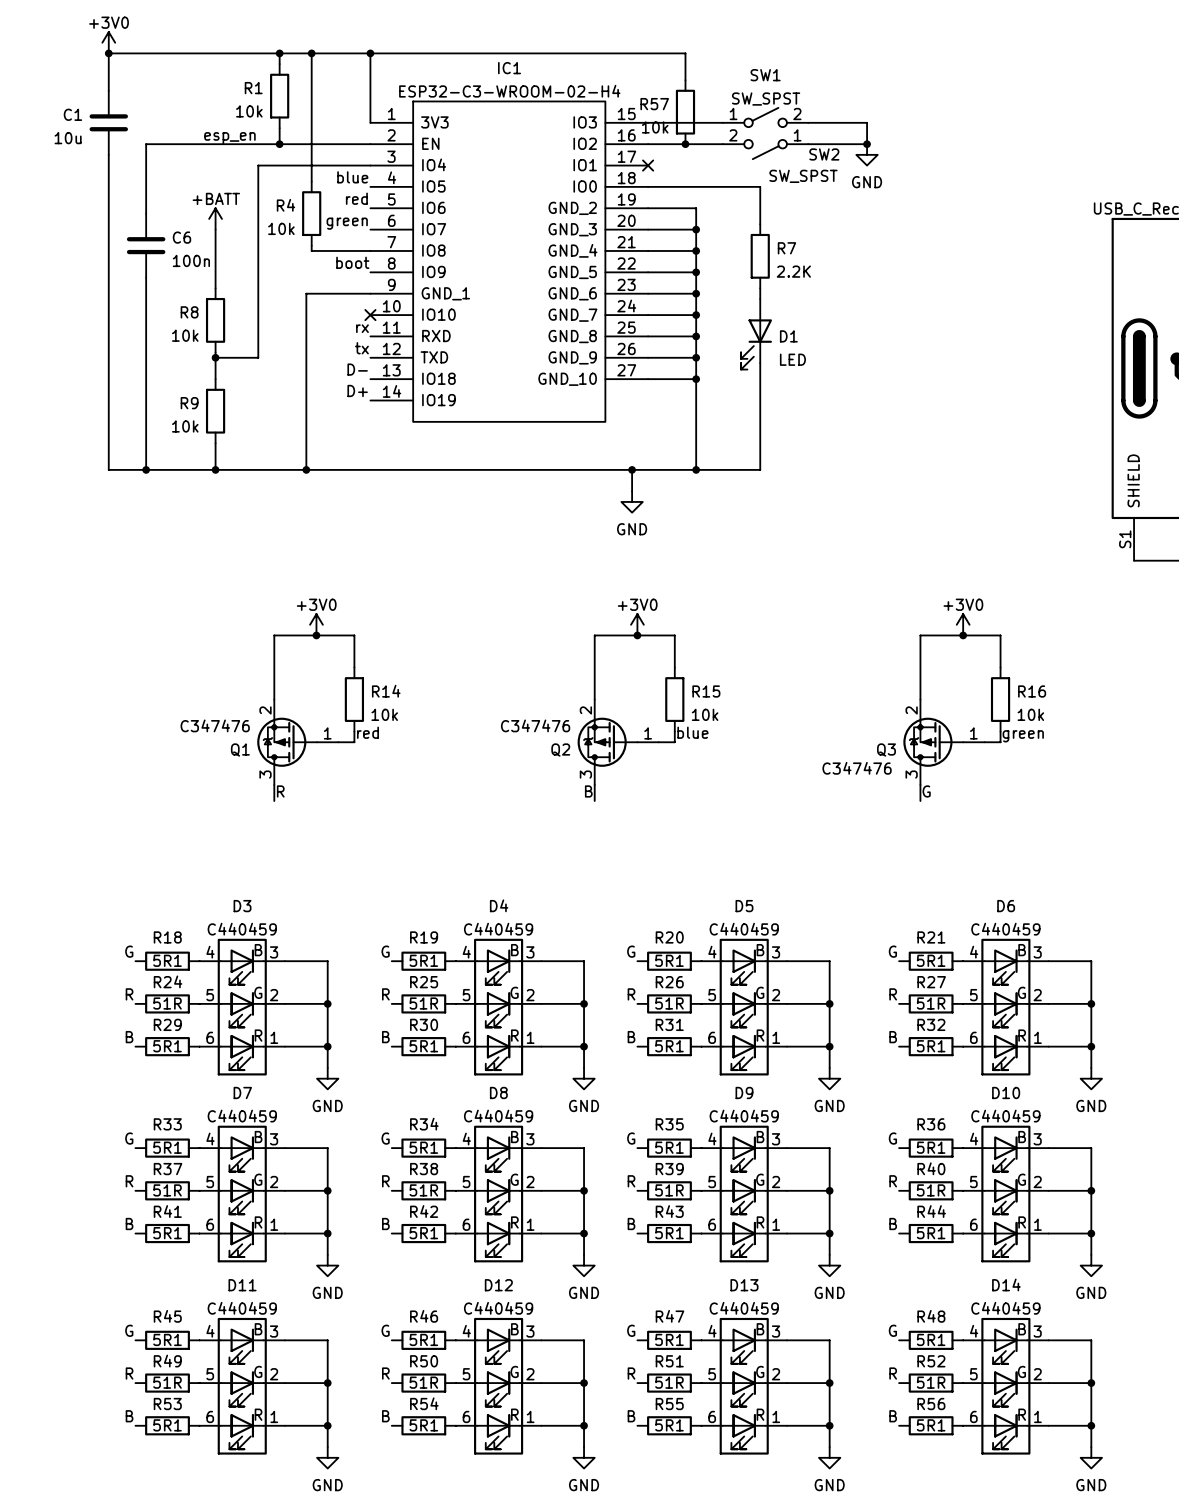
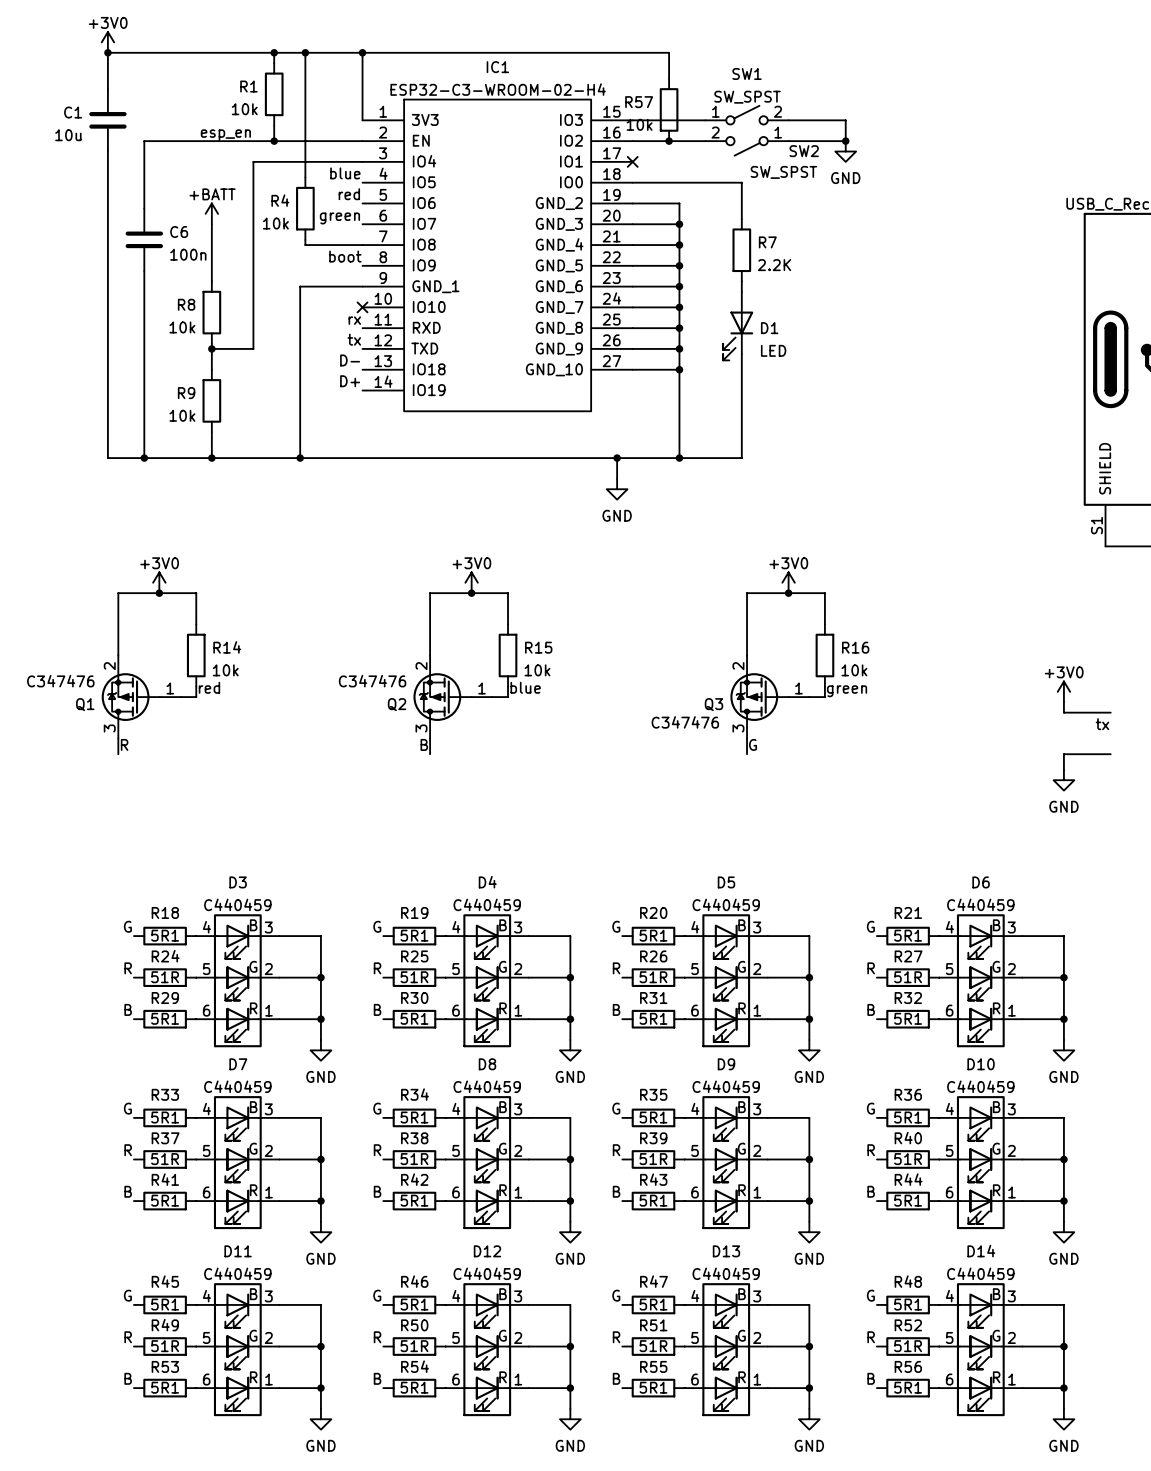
power symbol: none -> +3V0 (159, 582)
power symbol: none -> +3V0 (471, 582)
power symbol: none -> +3V0 (788, 582)
junction: none -> (159, 593)
junction: none -> (471, 593)
junction: none -> (788, 593)
power symbol: +3V0 (316, 624) -> none
power symbol: +3V0 (637, 624) -> none
power symbol: +3V0 (963, 624) -> none
junction: (316, 635) -> none
junction: (637, 635) -> none
junction: (963, 635) -> none
wire: (354, 667) (354, 635) (274, 635) (274, 699) -> (196, 624) (196, 593) (118, 593) (118, 655)
wire: (674, 667) (674, 635) (594, 635) (594, 699) -> (508, 624) (508, 593) (430, 593) (430, 655)
wire: (1000, 667) (1000, 635) (920, 635) (920, 699) -> (824, 624) (824, 593) (747, 593) (747, 655)
R14 position: (354, 699) -> (196, 655)
R15 position: (674, 699) -> (508, 655)
R16 position: (1000, 699) -> (824, 655)
power symbol: none -> +3V0 (1063, 691)
wire: none -> (1063, 702) (1063, 712) (1110, 712)
wire: (354, 731) (354, 742) (338, 742) -> (196, 686) (196, 697) (180, 697)
wire: (674, 731) (674, 742) (658, 742) -> (508, 686) (508, 697) (492, 697)
wire: (1000, 731) (1000, 742) (984, 742) -> (824, 686) (824, 697) (809, 697)
label position: red (367, 732) -> red (209, 687)
label position: blue (692, 732) -> blue (525, 687)
label position: green (1023, 736) -> green (847, 691)
Q1 position: (297, 742) -> (141, 697)
Q2 position: (618, 742) -> (452, 697)
Q3 position: (943, 742) -> (769, 697)
label: none -> tx (1102, 724)
wire: none -> (1110, 754) (1063, 754) (1063, 769)
wire: (274, 784) (274, 801) -> (118, 738) (118, 754)
wire: (594, 784) (594, 801) -> (430, 738) (430, 754)
wire: (920, 784) (920, 801) -> (747, 738) (747, 754)
label position: R (280, 791) -> R (124, 744)
label position: B (588, 791) -> B (424, 744)
label position: G (926, 791) -> G (753, 744)
power symbol: none -> GND (1063, 780)

